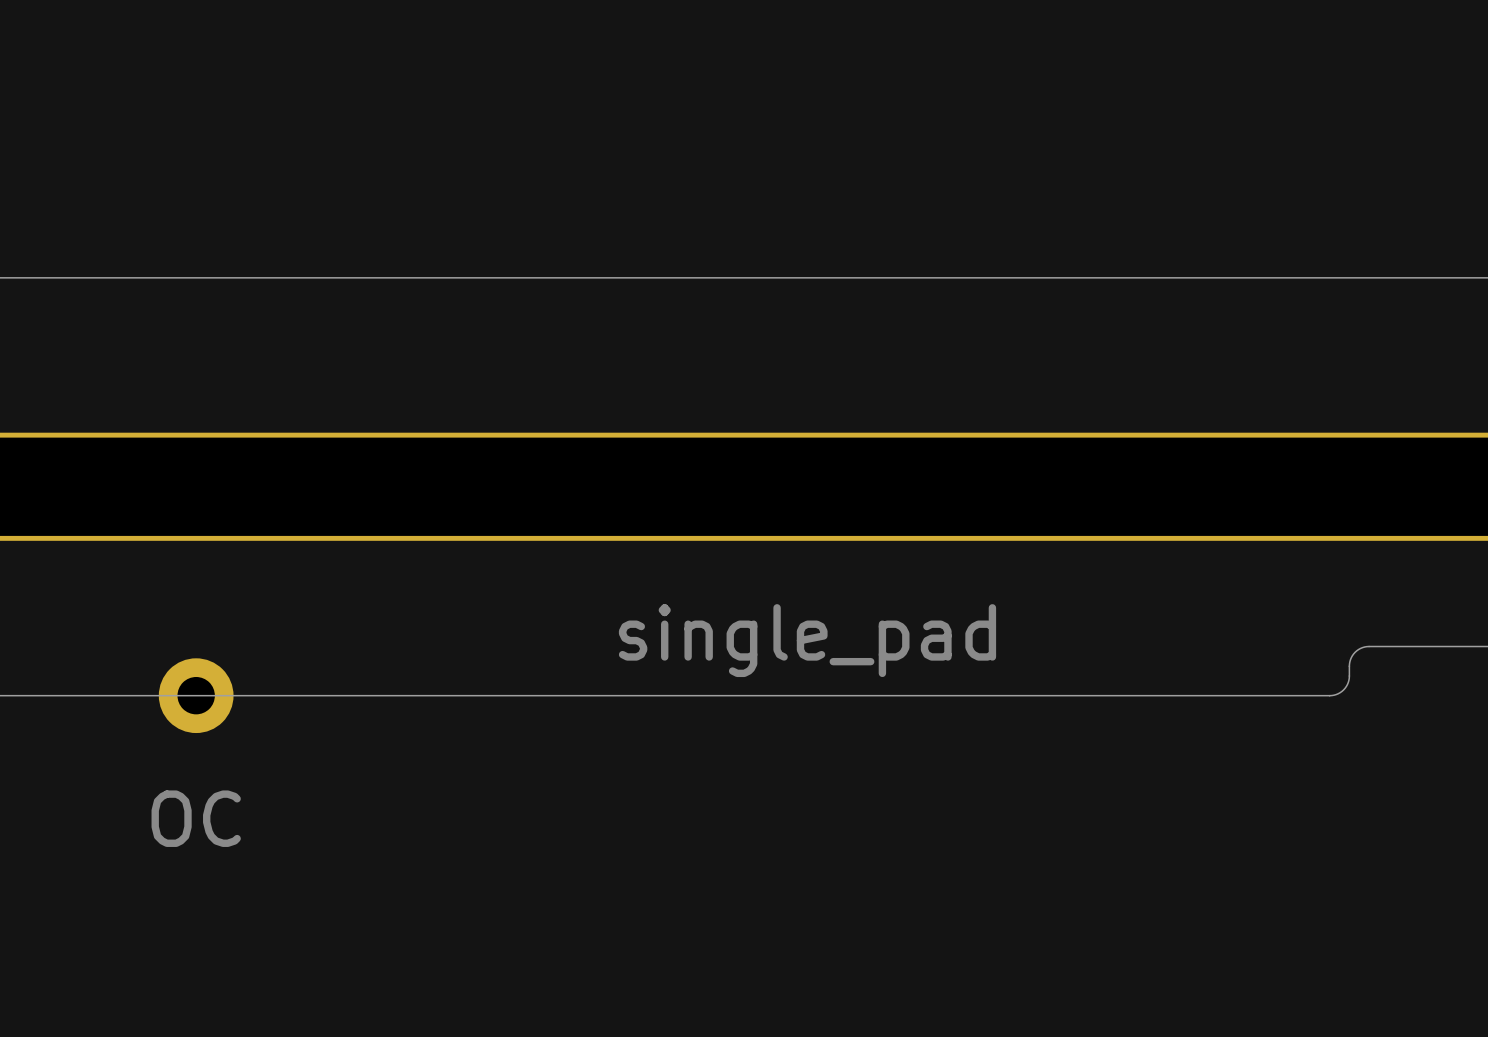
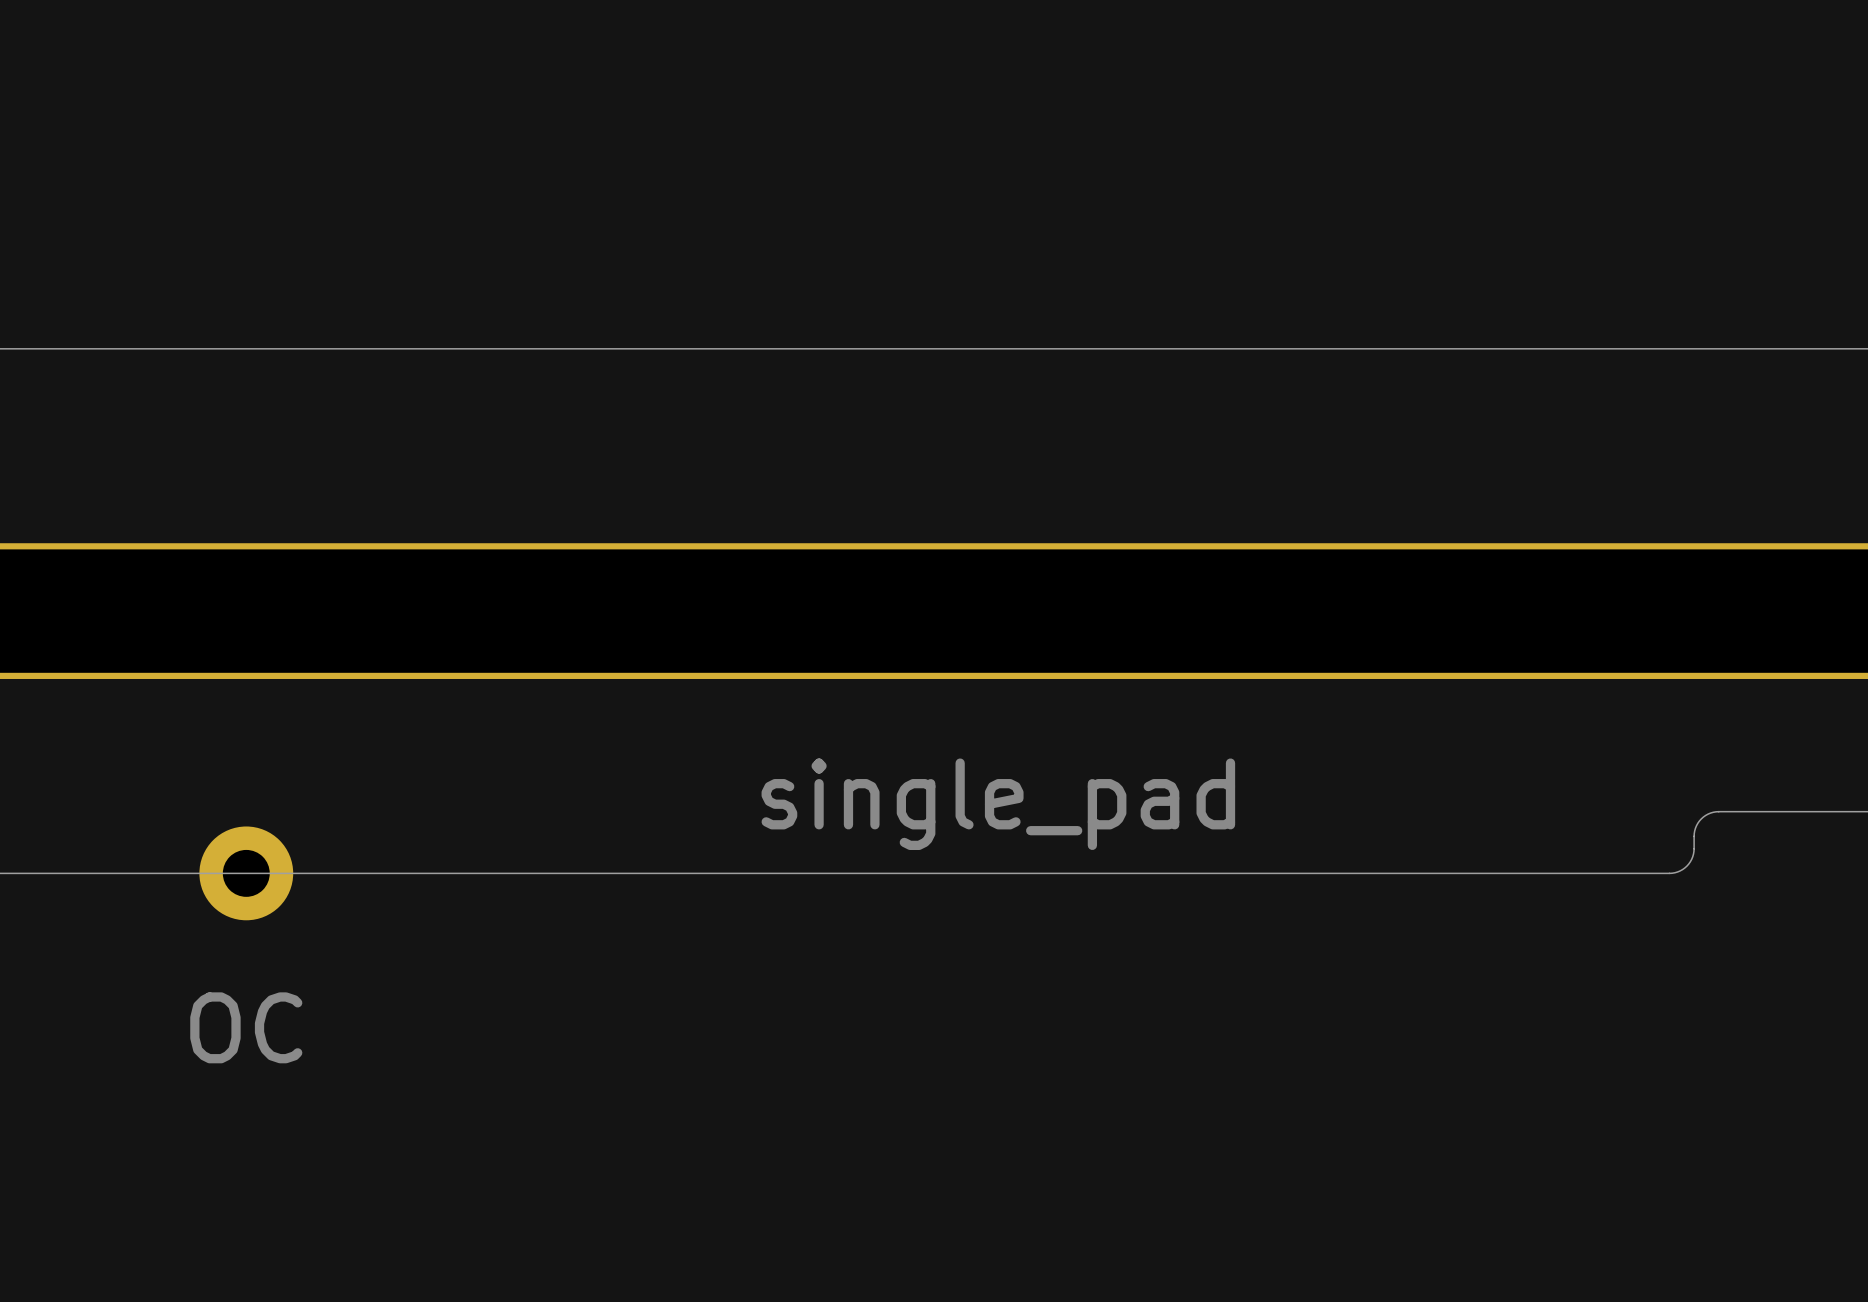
part value position: single_pad (807, 640) -> single_pad (998, 804)

